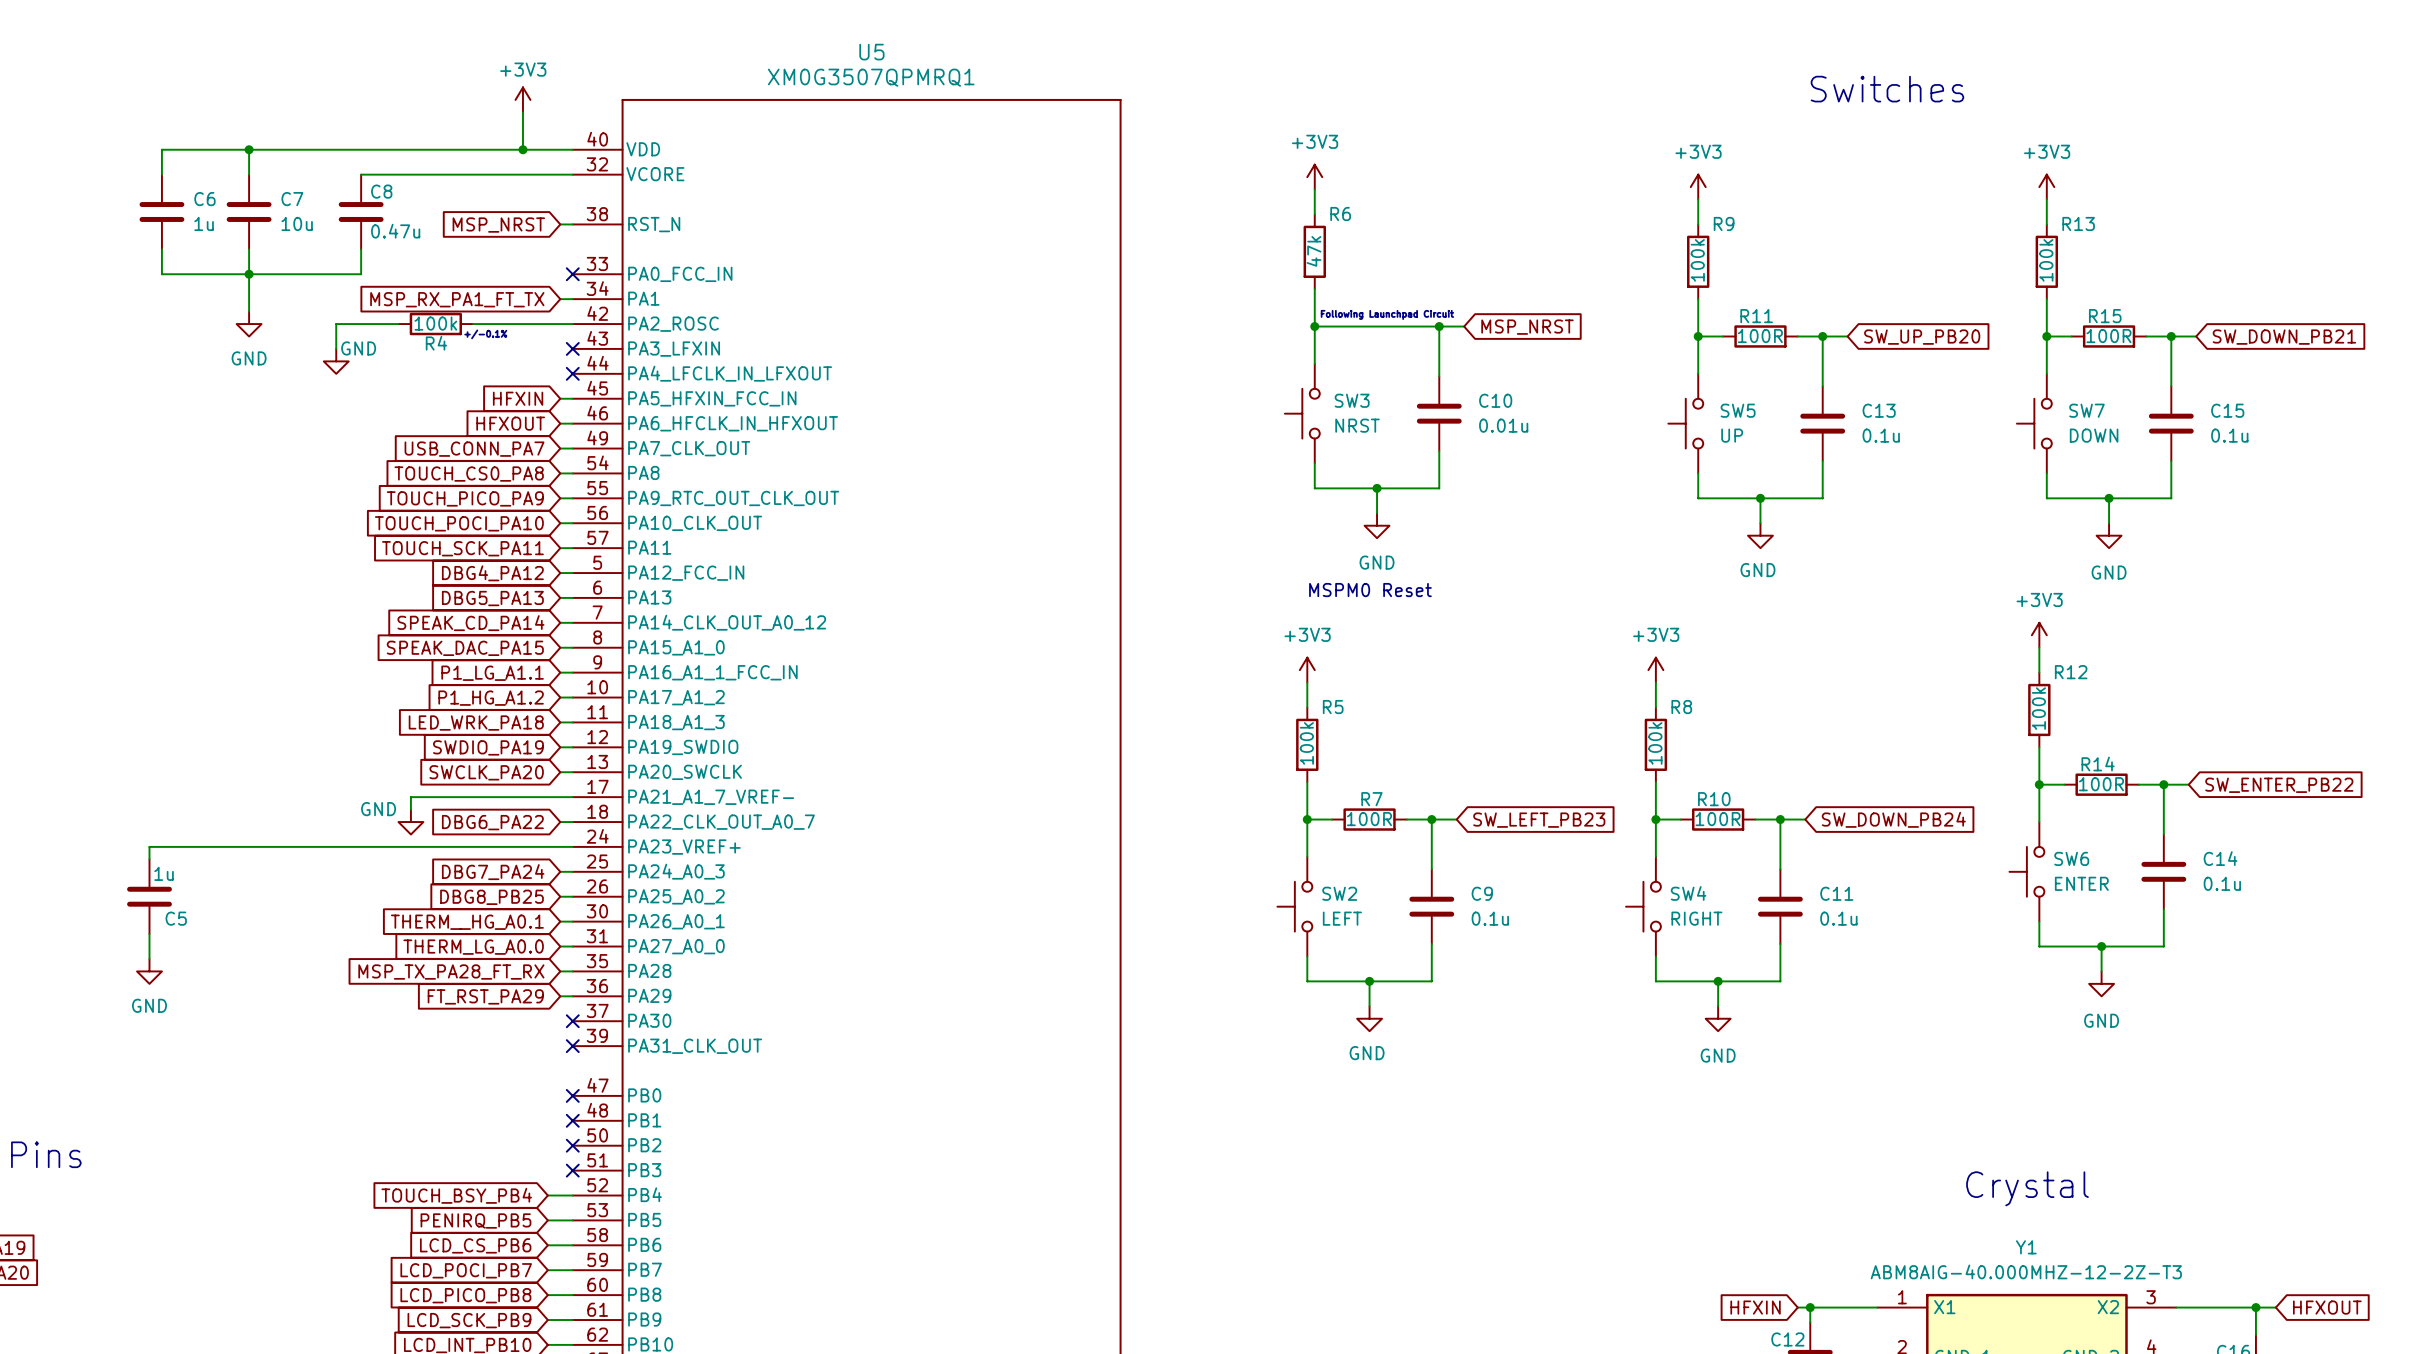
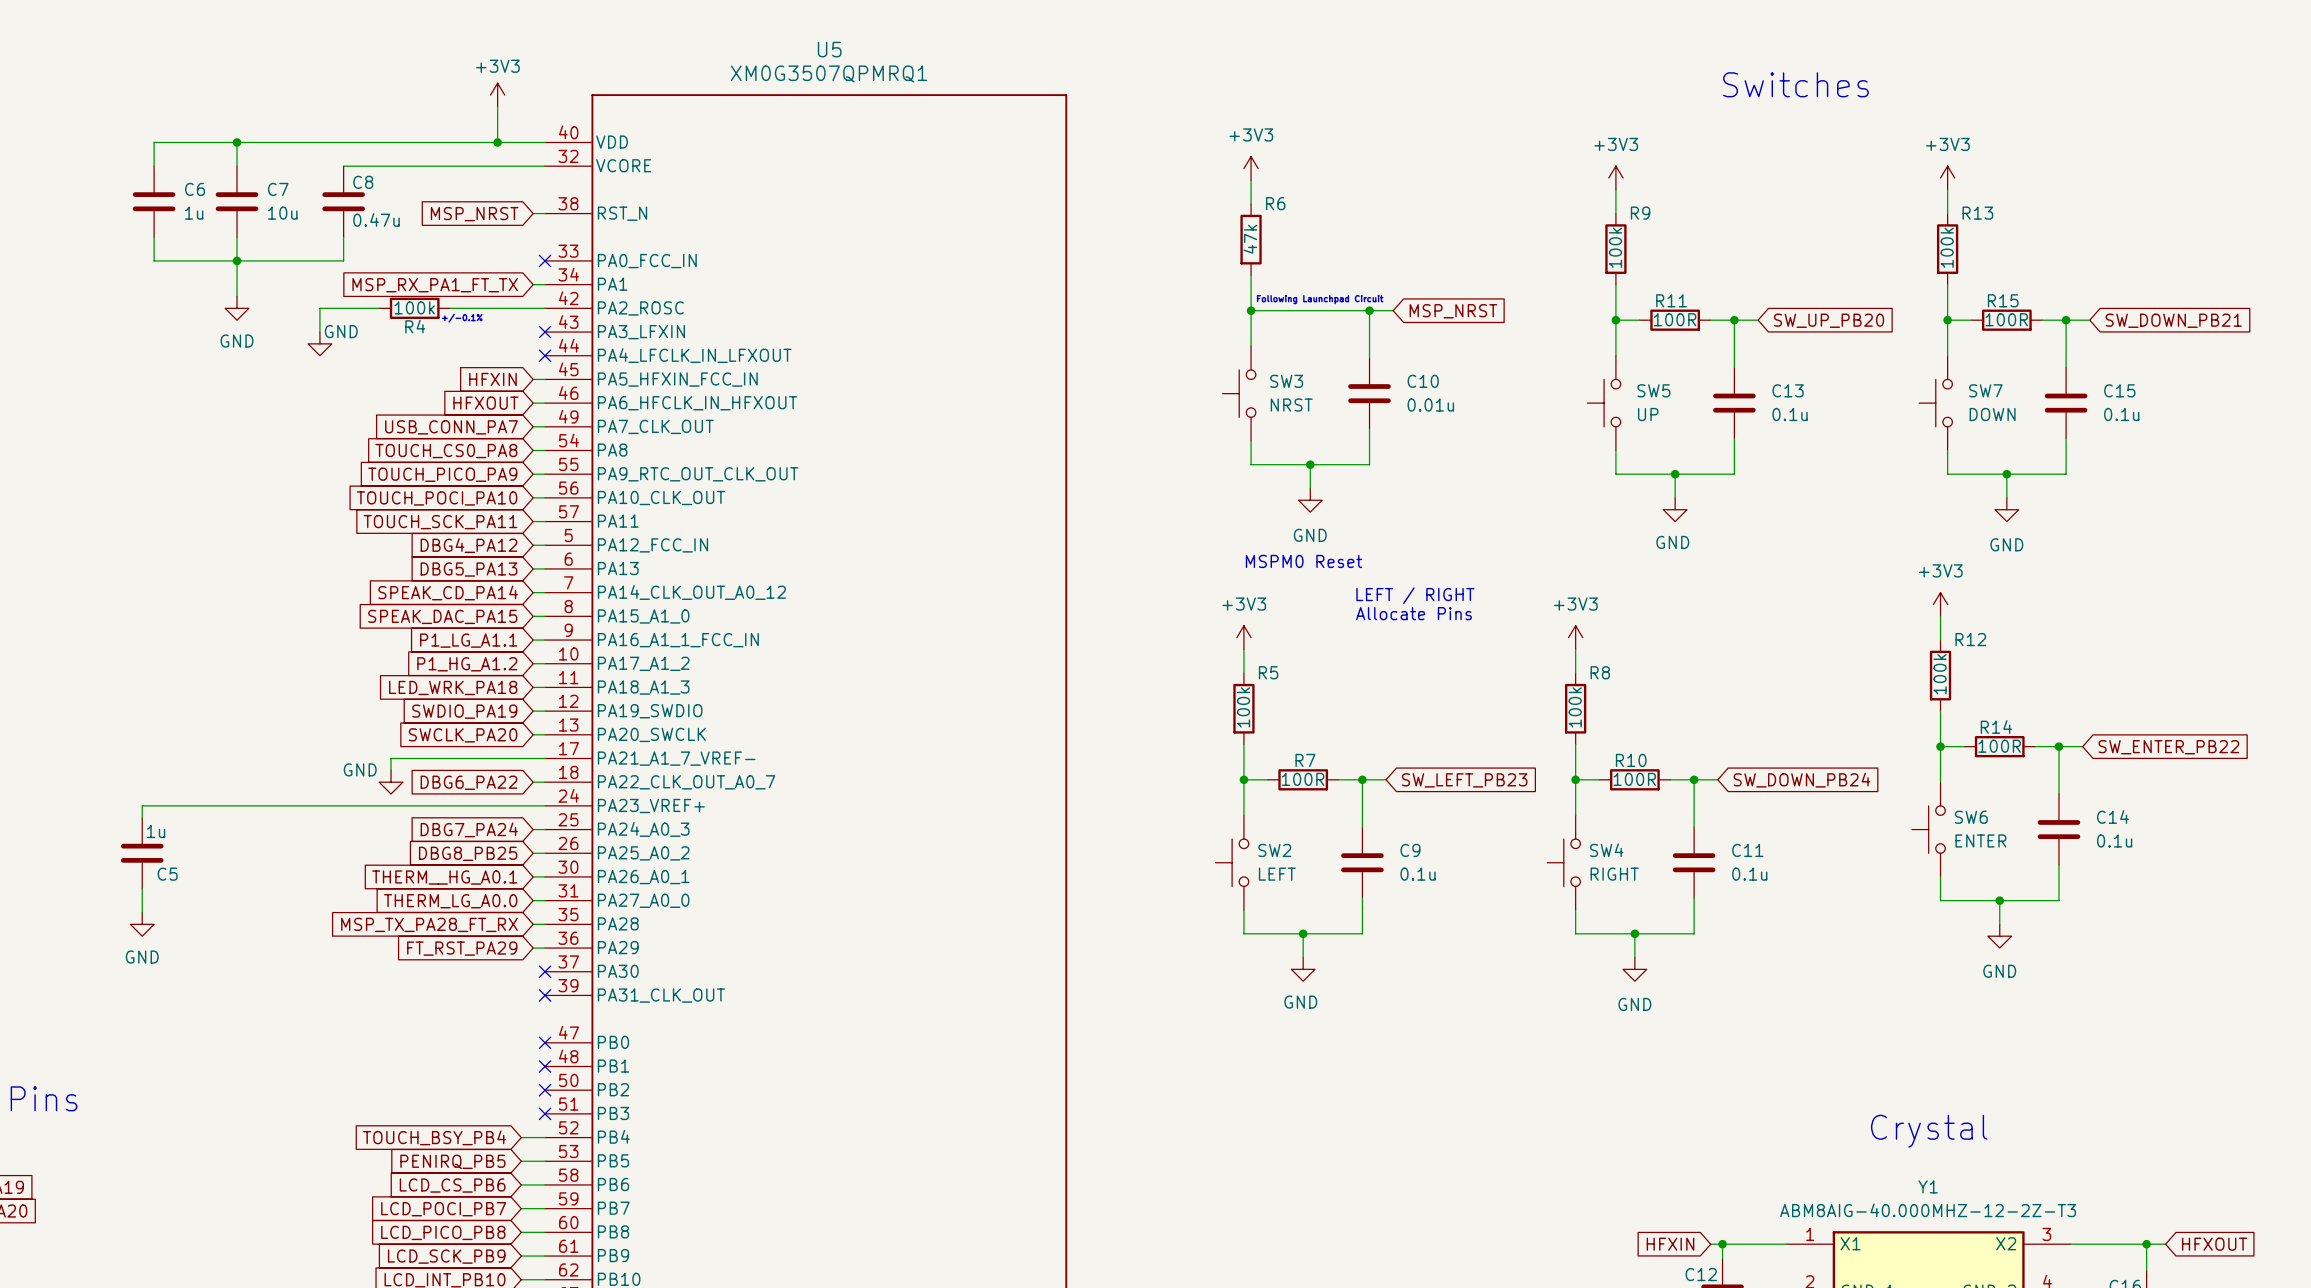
text: none -> LEFT / RIGHT (1415, 595)
text: none -> Allocate Pins (1413, 613)

